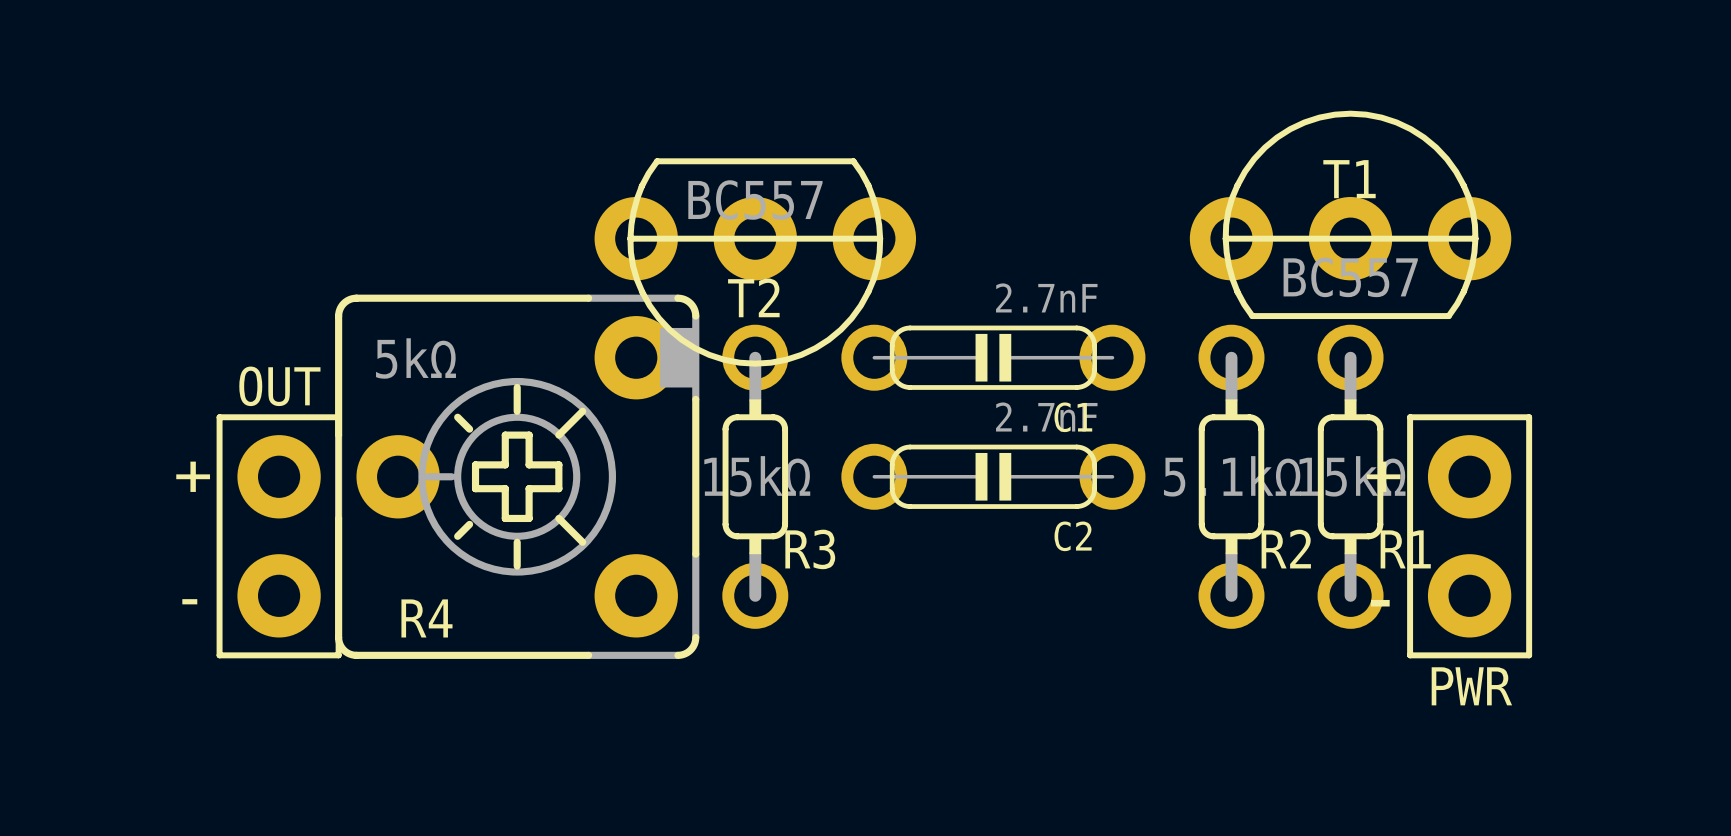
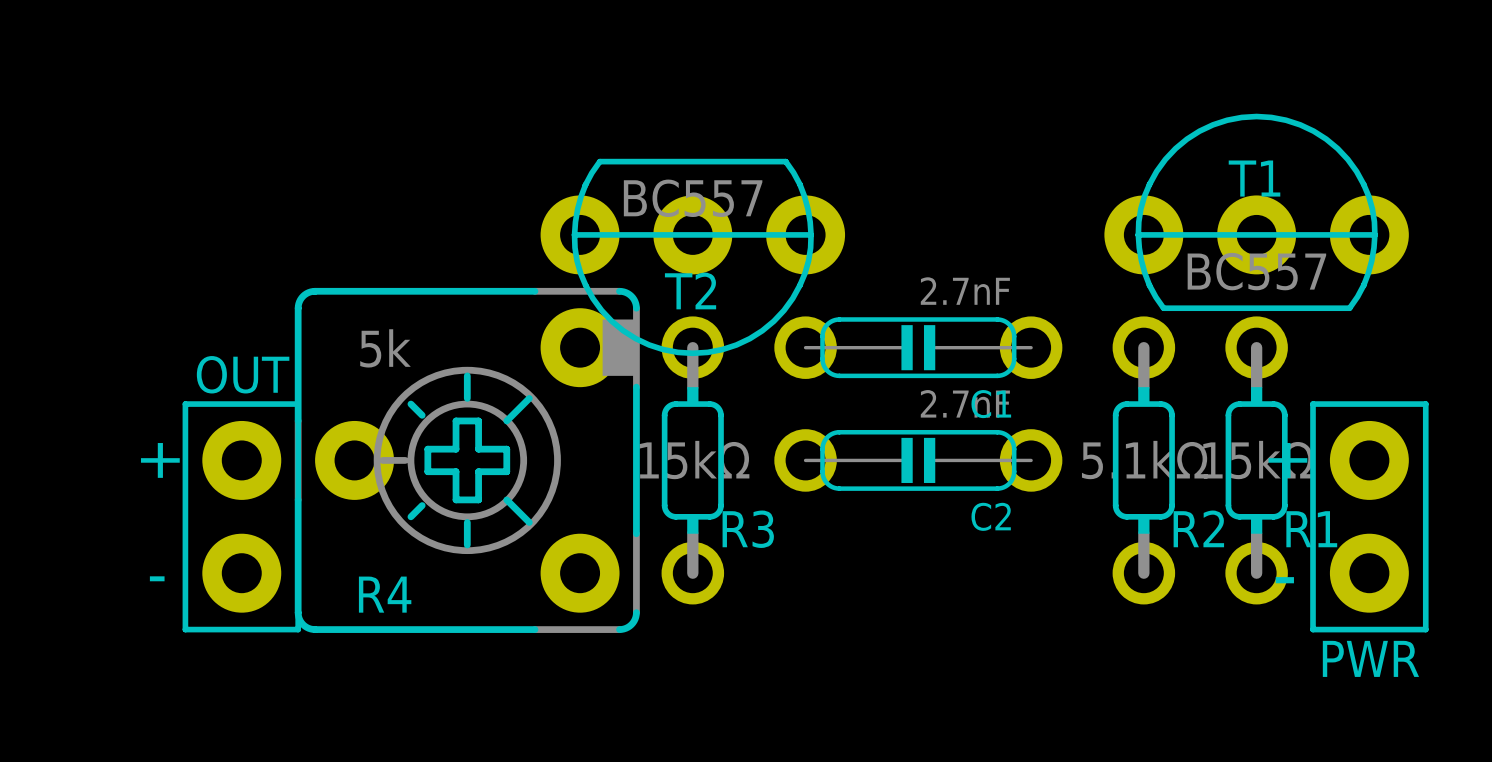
R4 value: 5kΩ (415, 358) -> 5k (385, 348)

